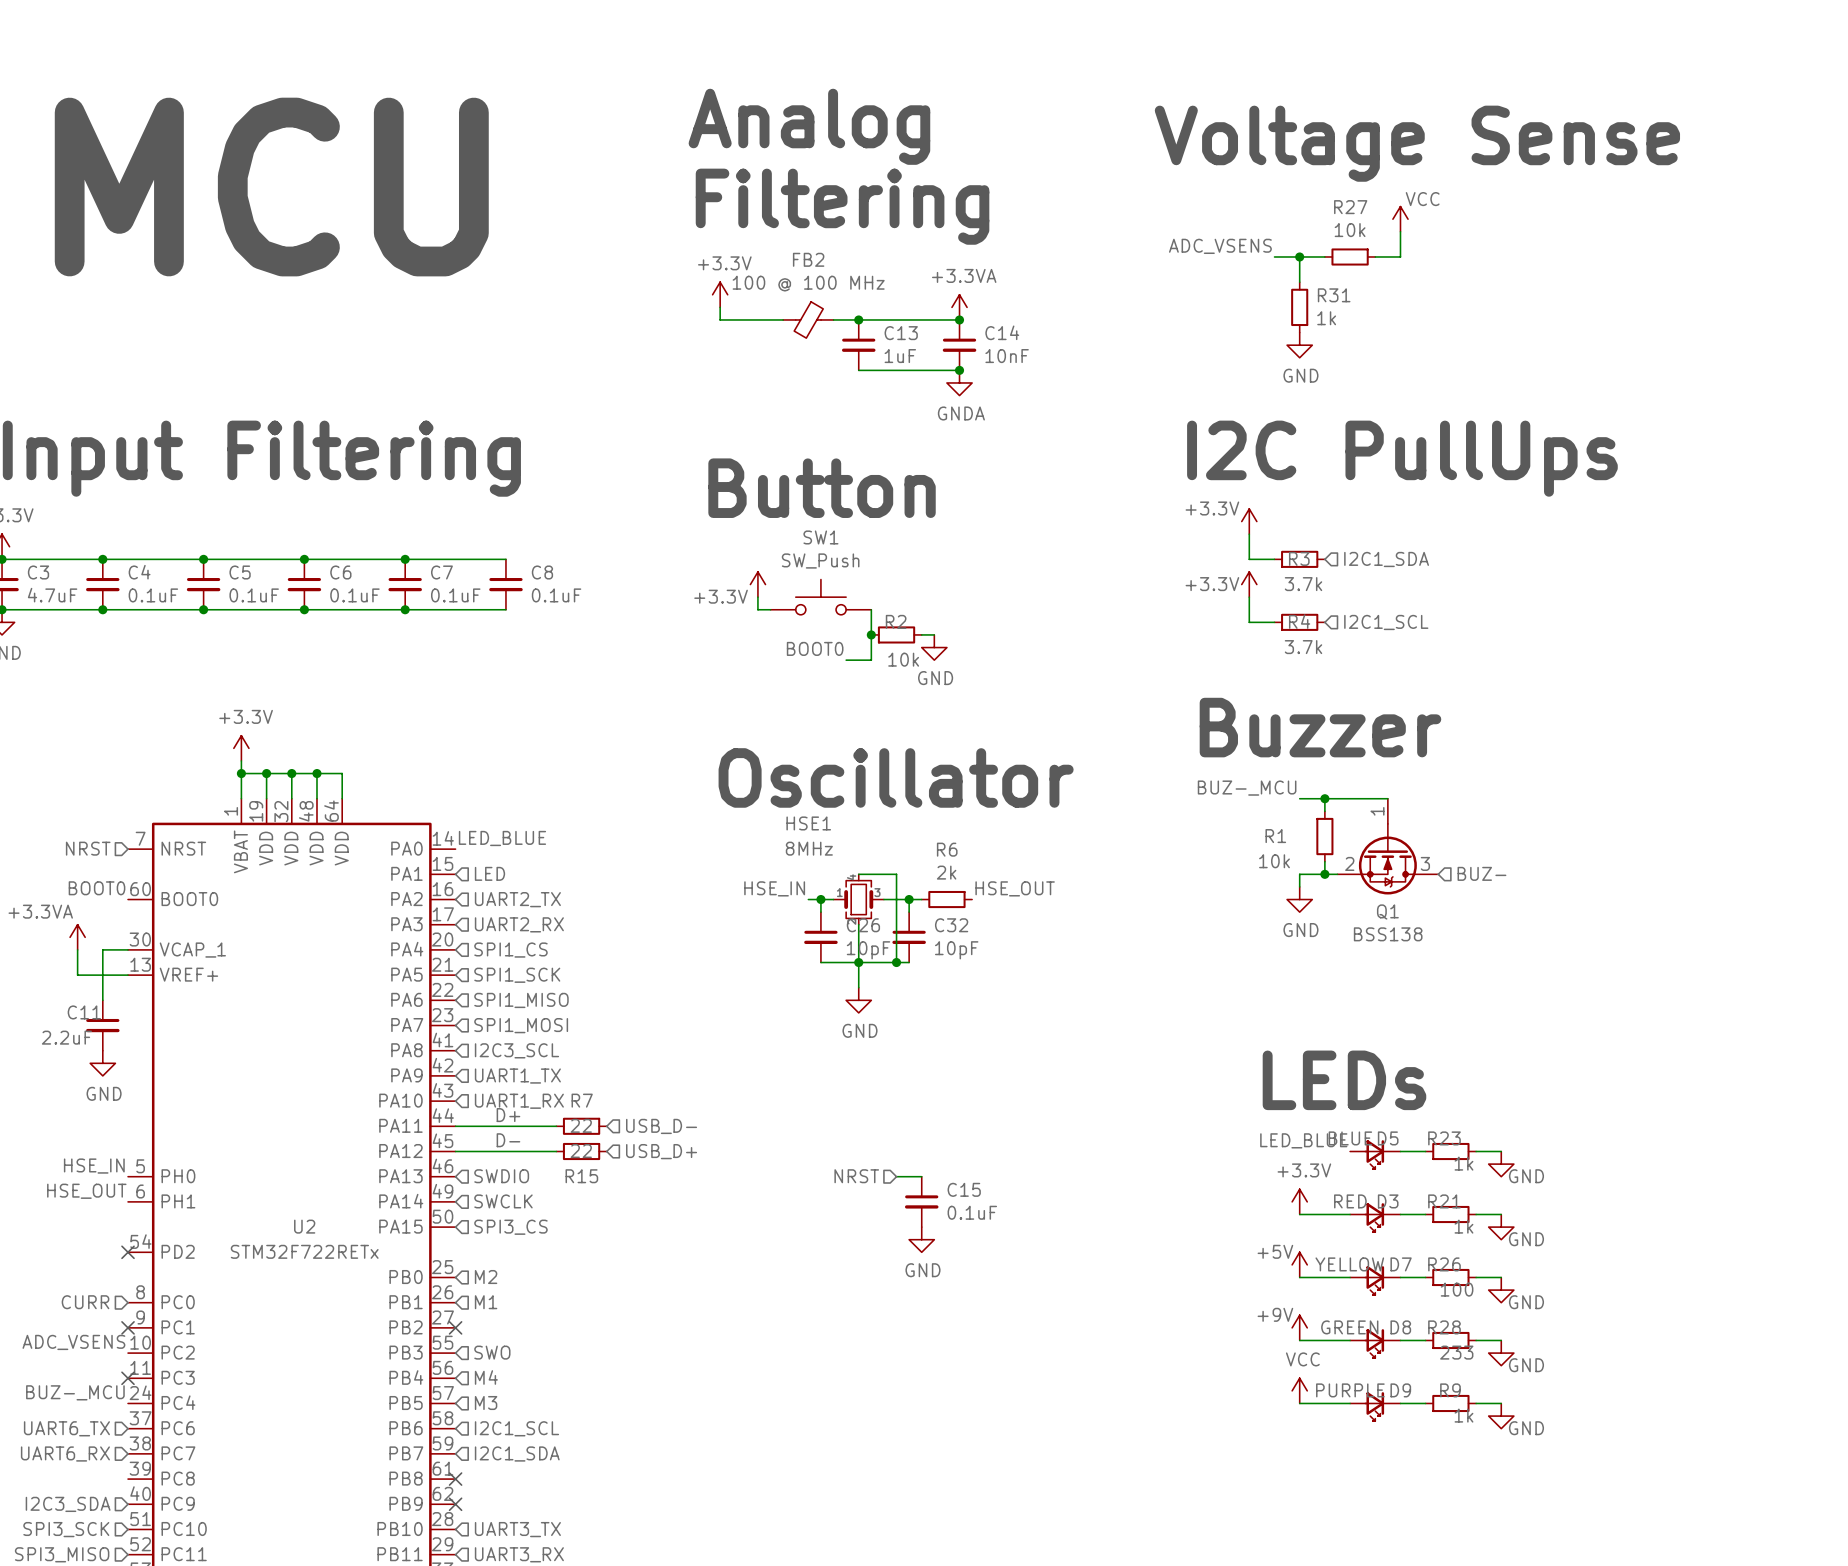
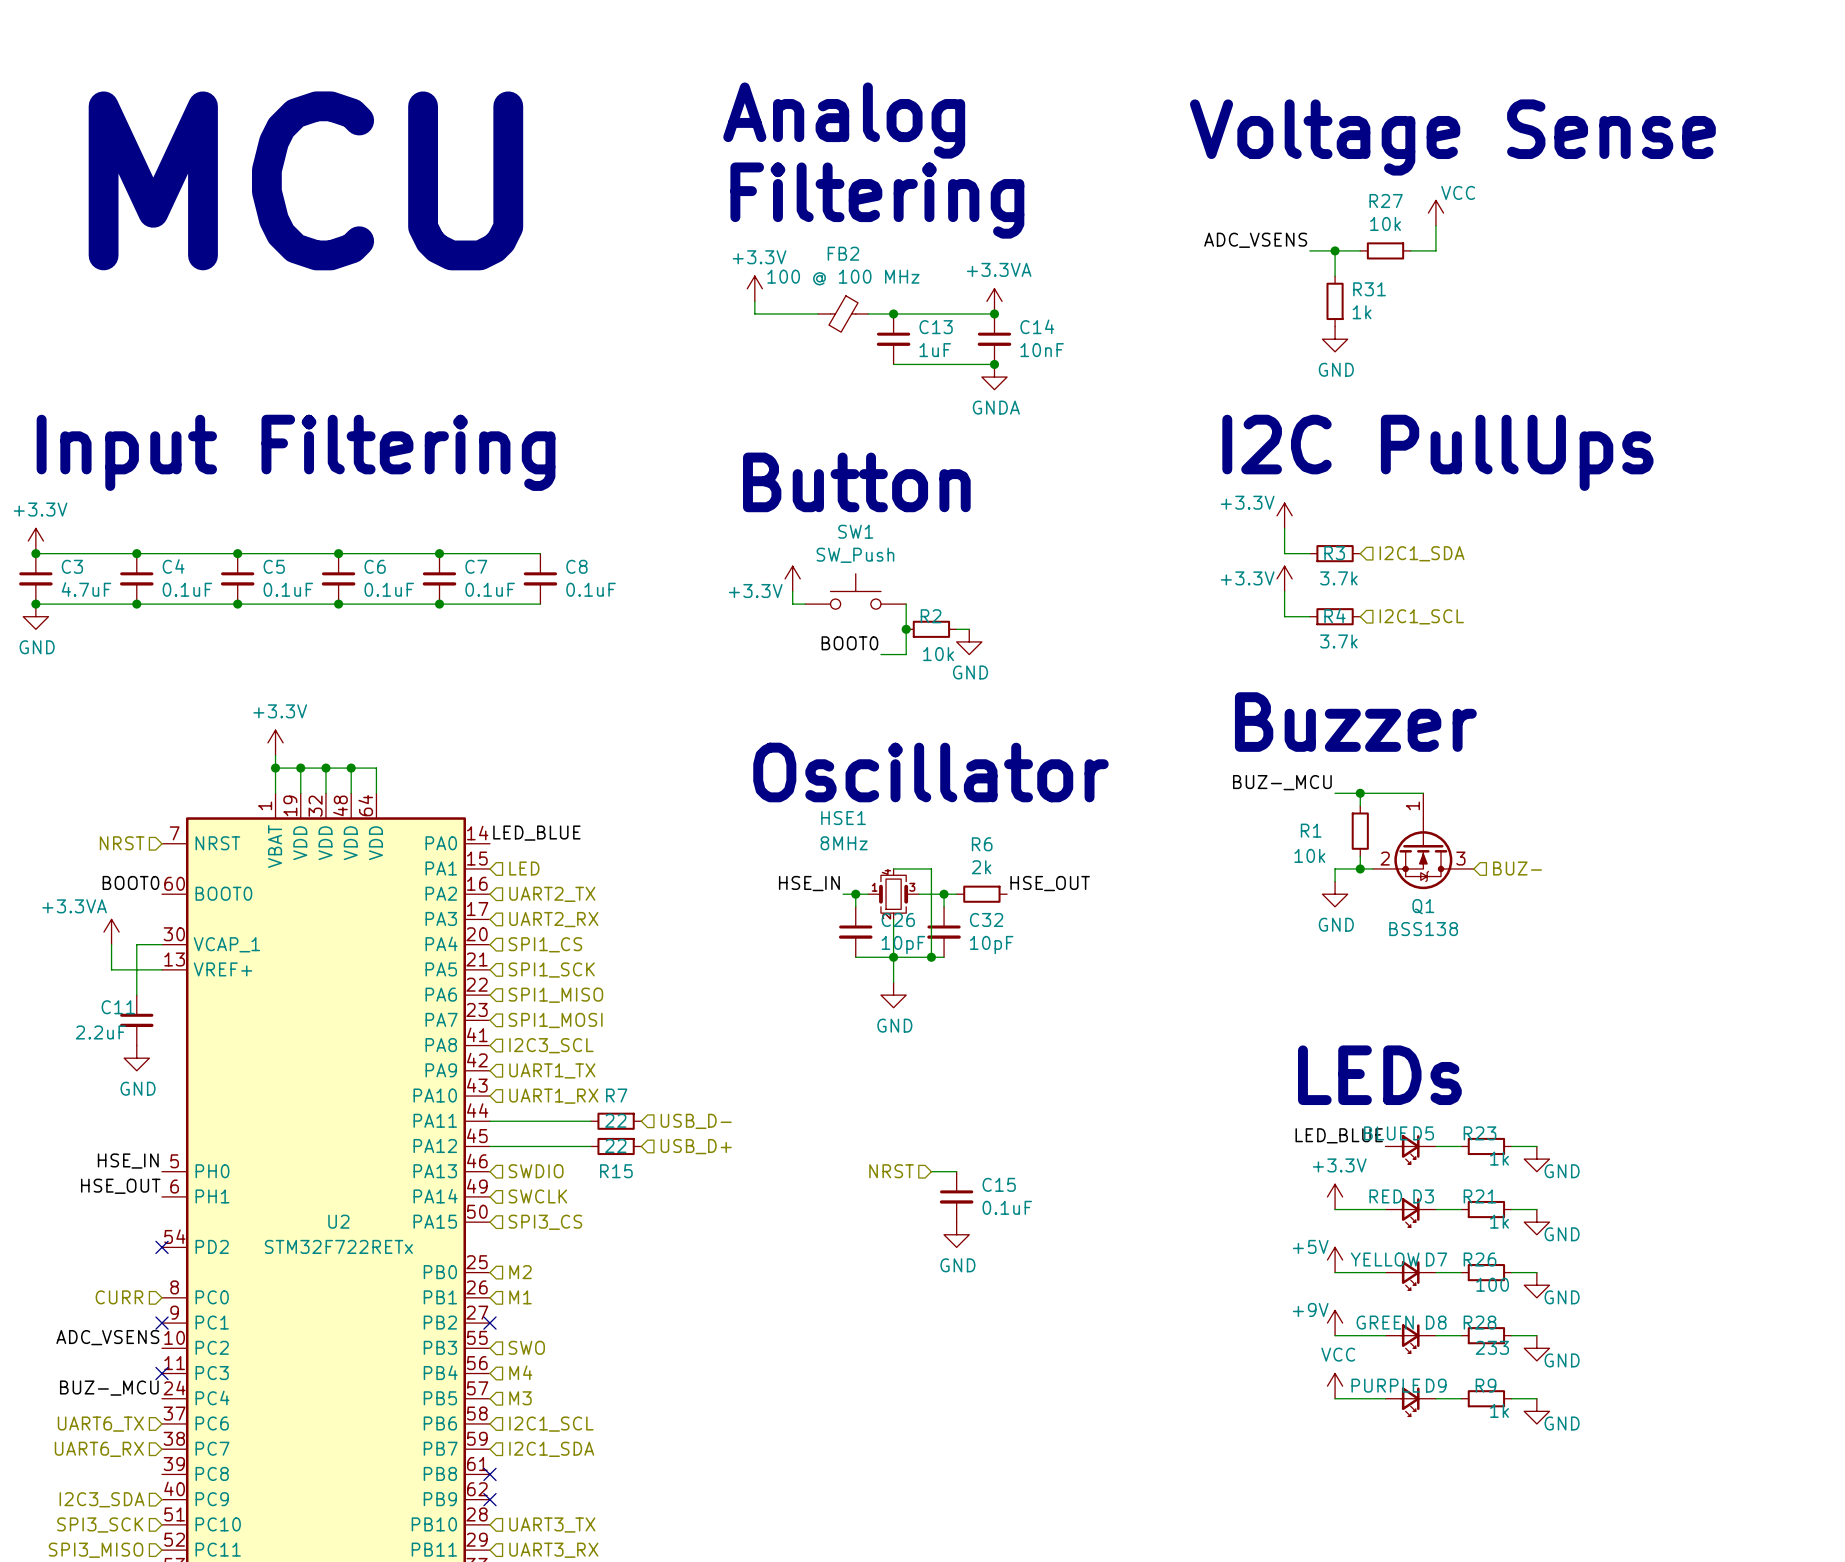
label: D+ (508, 1115) -> none
label: D- (508, 1140) -> none

